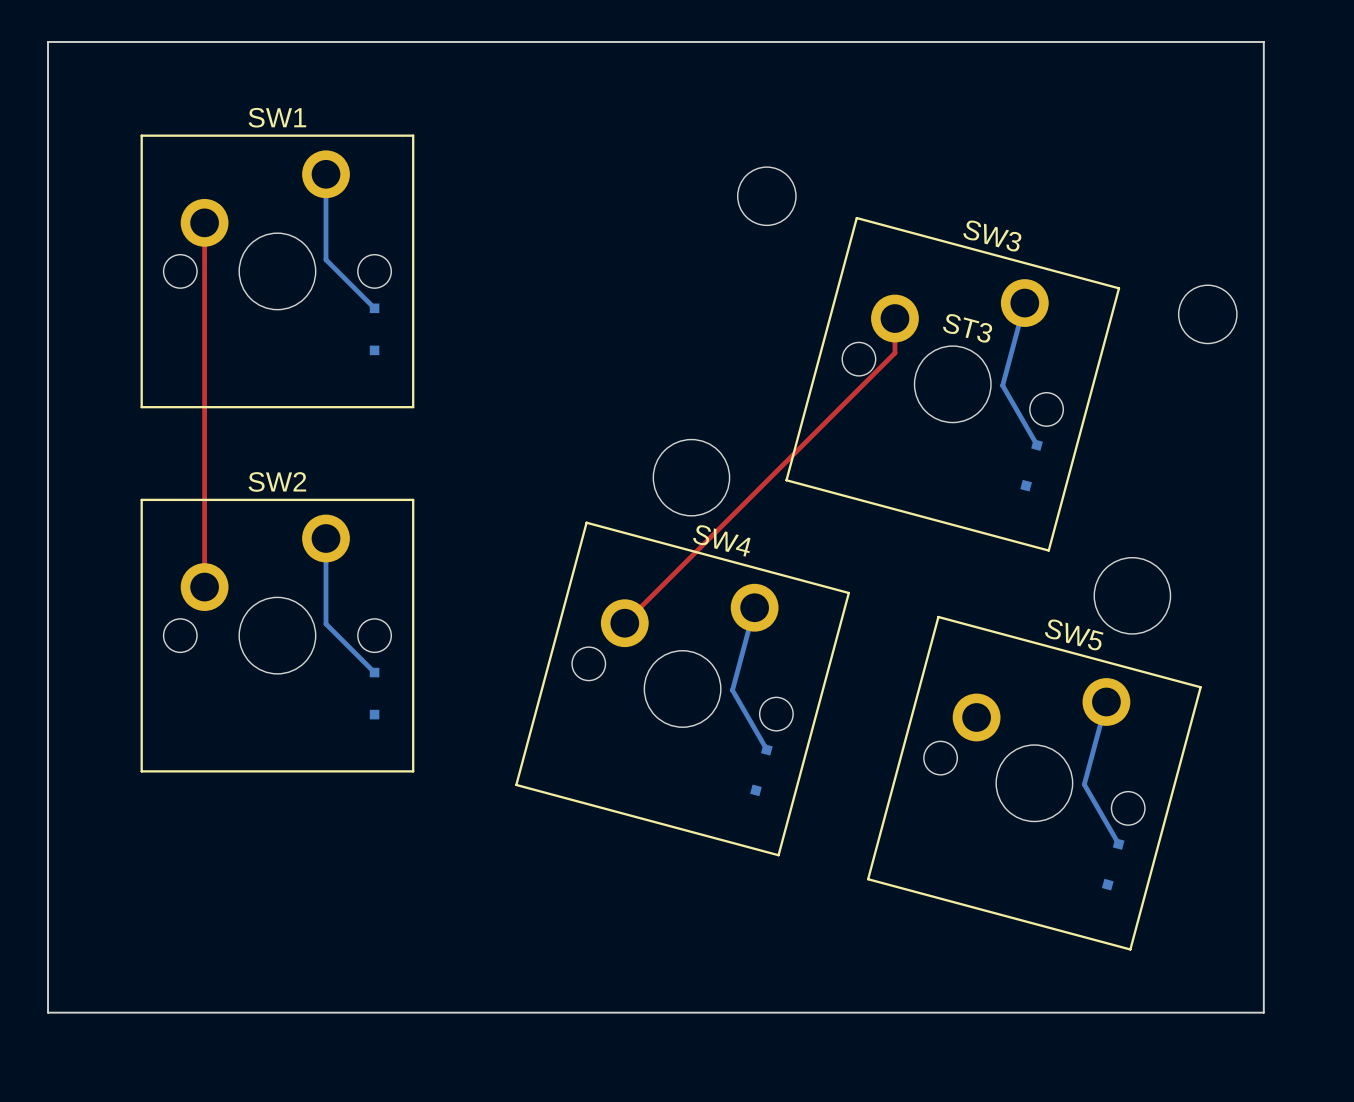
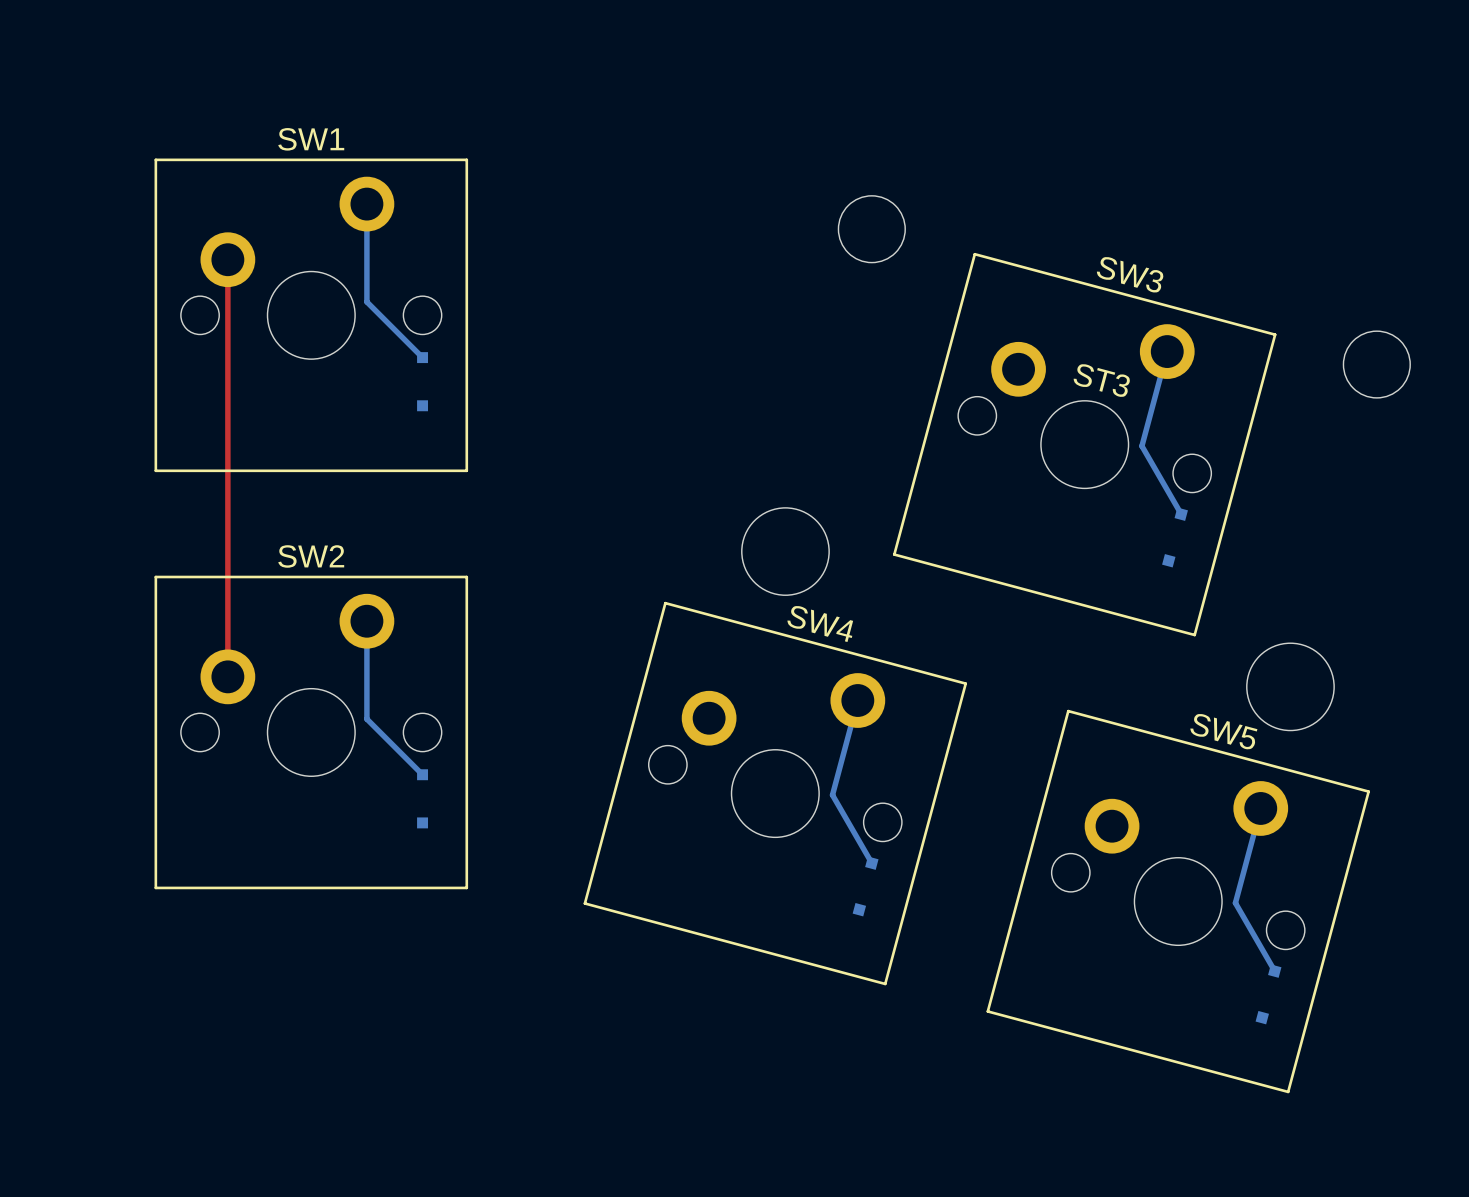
board edge: (48, 41) (48, 1012) (1263, 1012) (1263, 41) (48, 41) -> none
top track: (894, 318) (894, 353) (624, 623) -> none

